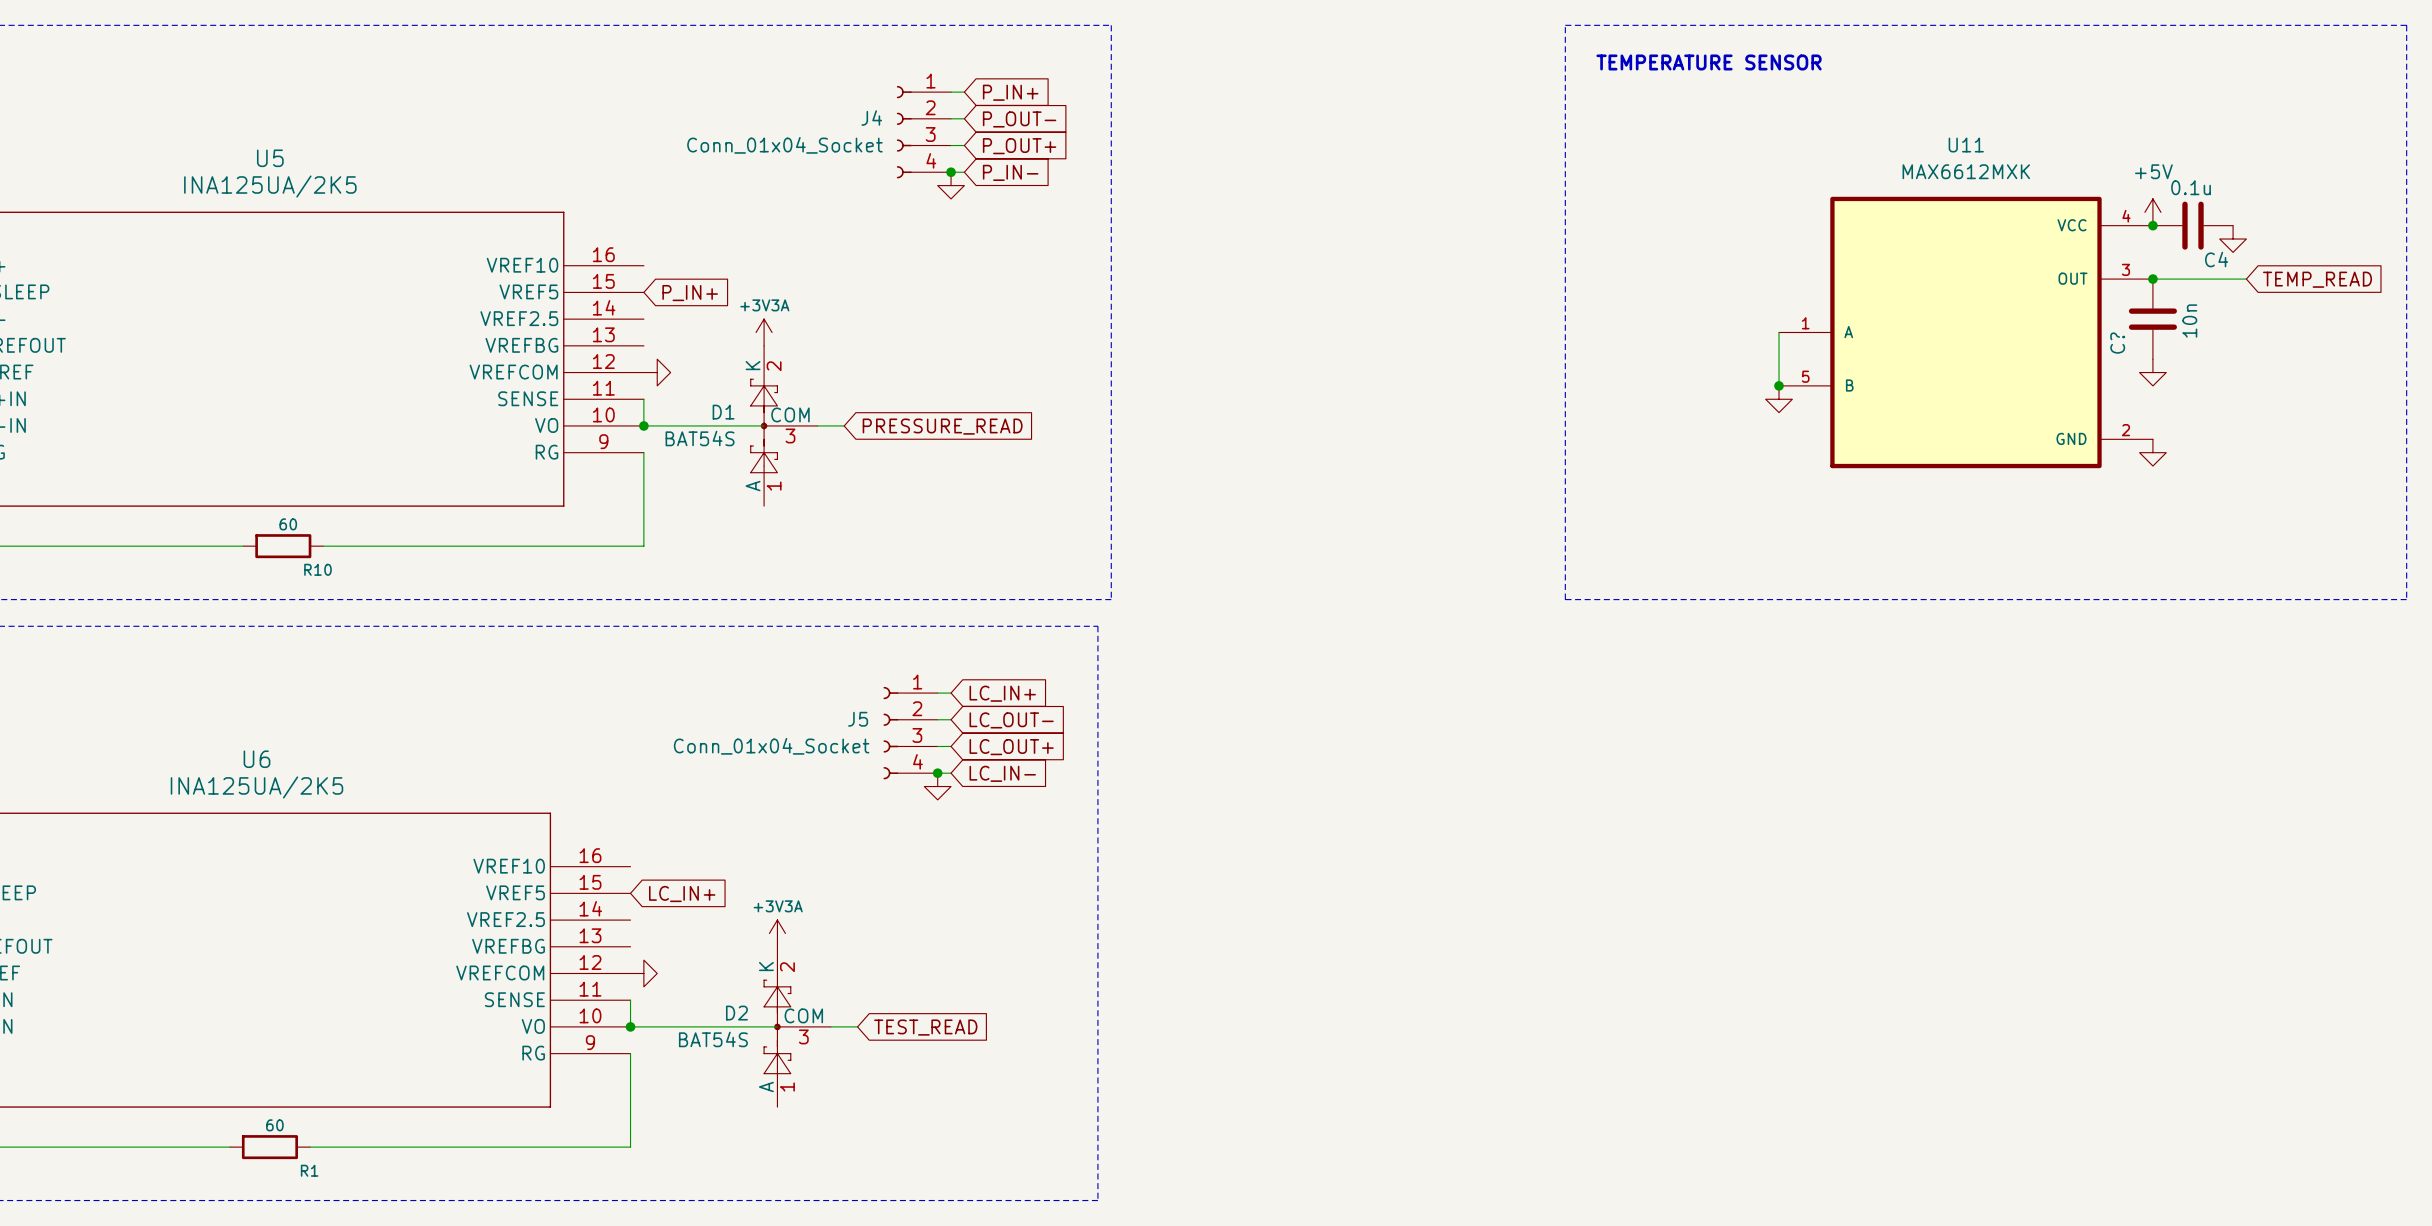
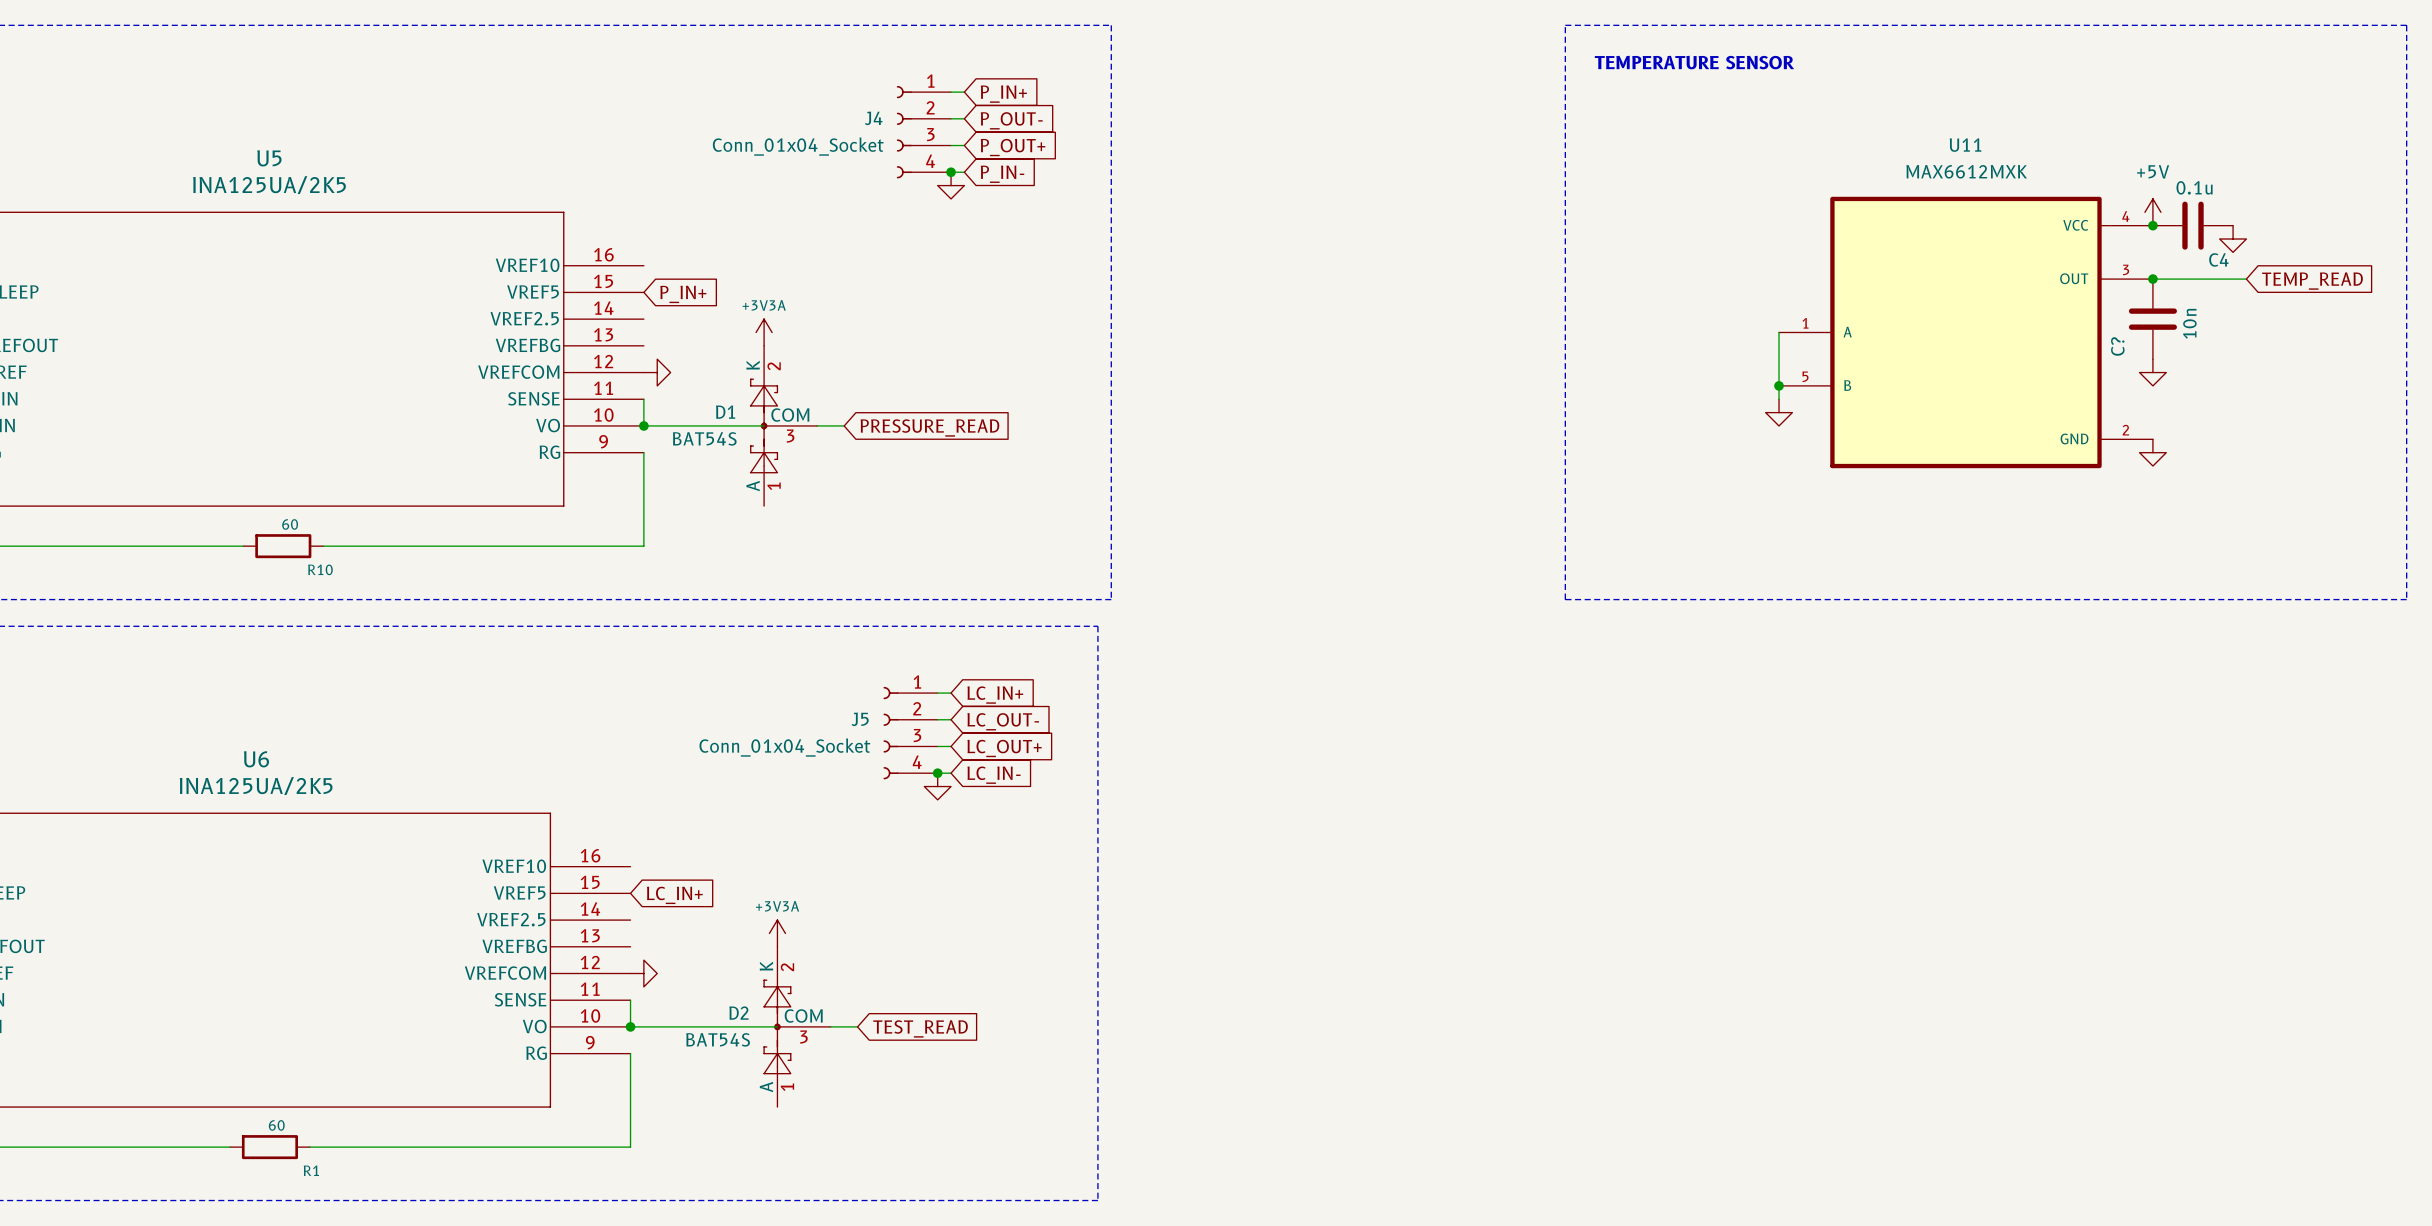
power symbol position: (1779, 399) -> (1779, 412)

